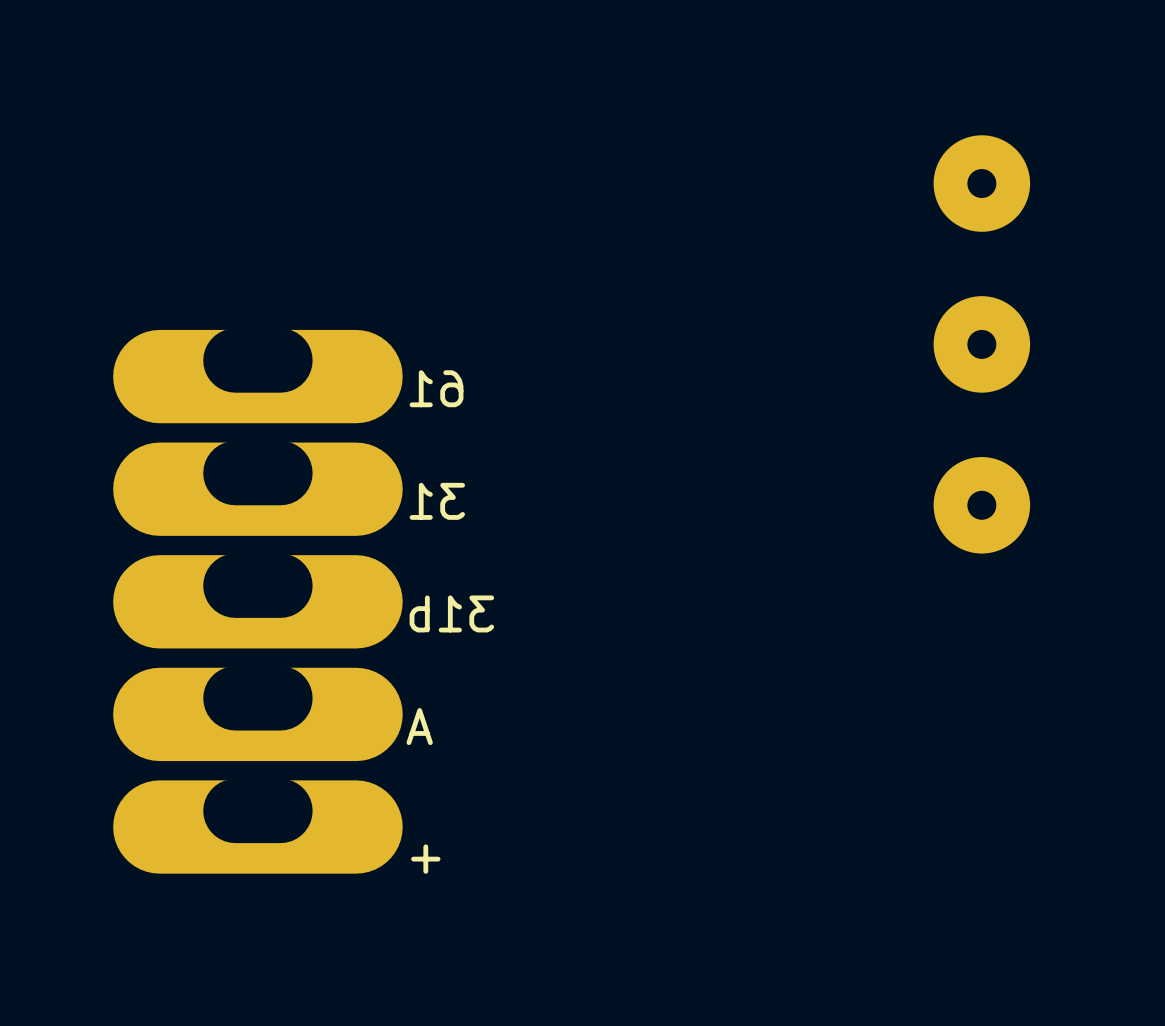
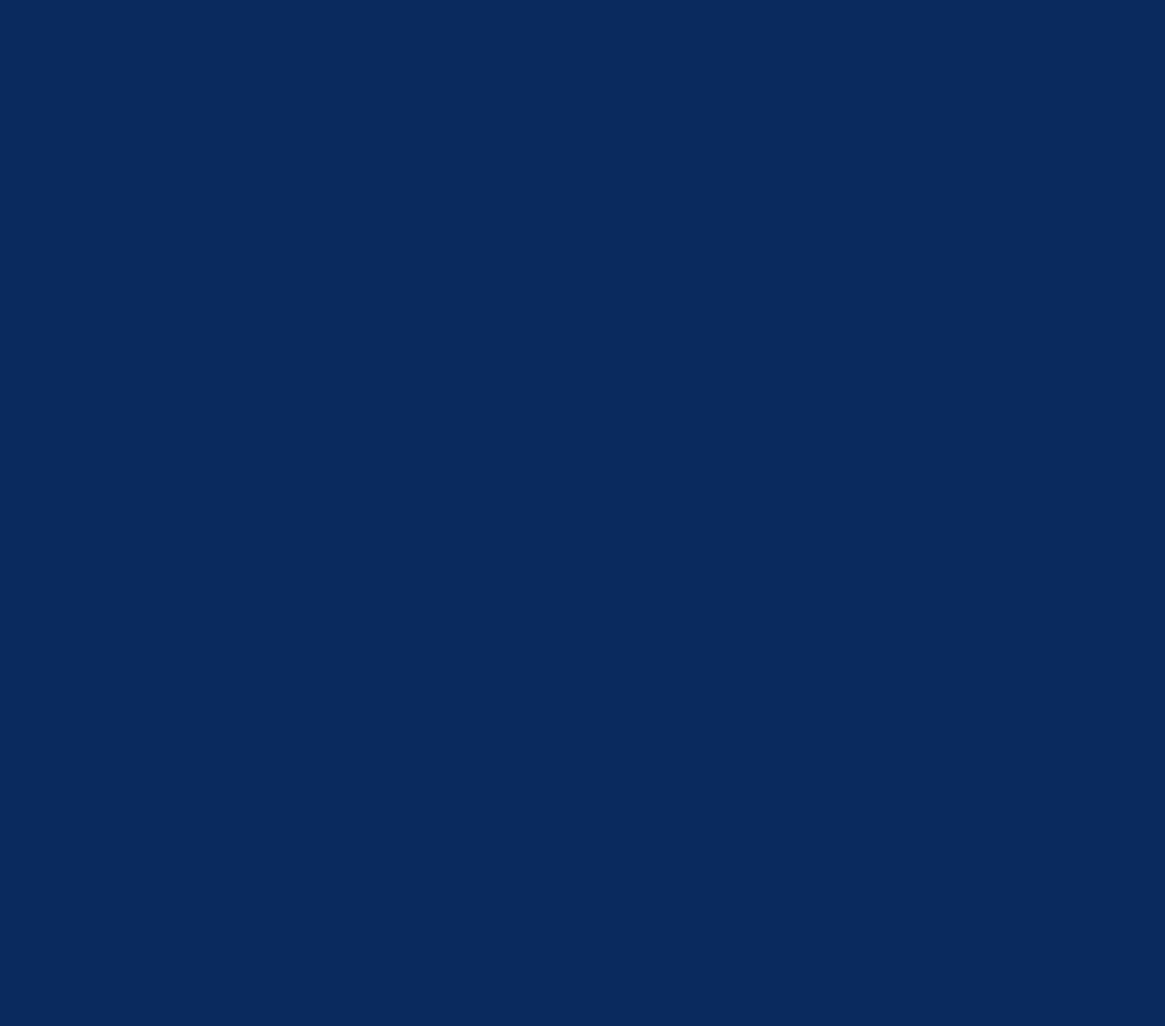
part: (981, 344) -> none
part: (257, 601) -> none

